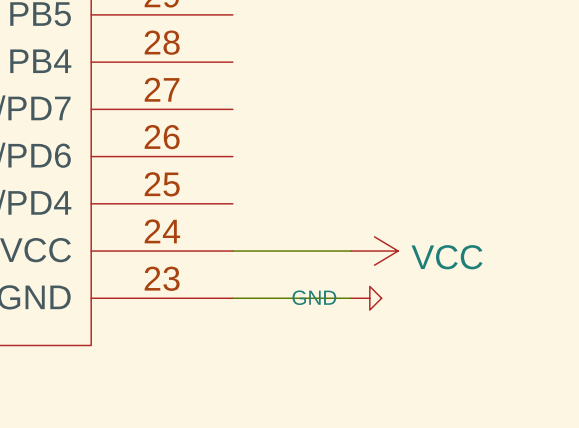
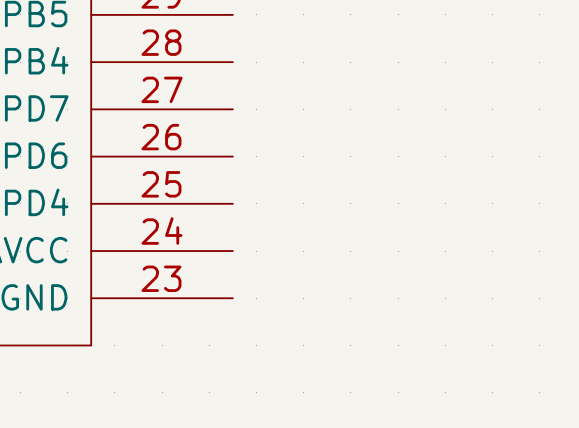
wire: (232, 251) (350, 251) -> none
power symbol: VCC (374, 251) -> none
wire: (232, 298) (350, 298) -> none
power symbol: GND (366, 298) -> none

